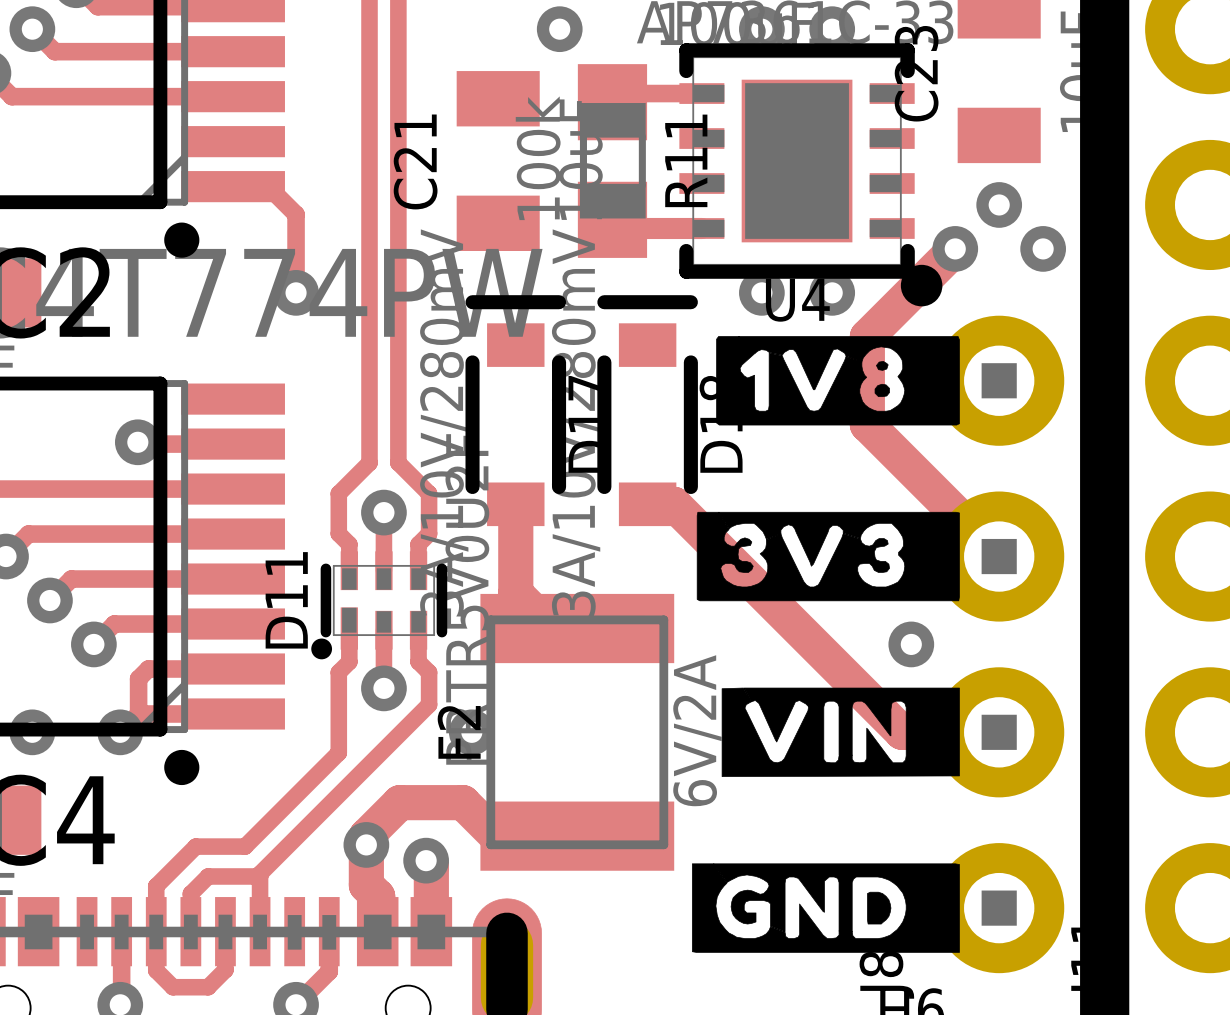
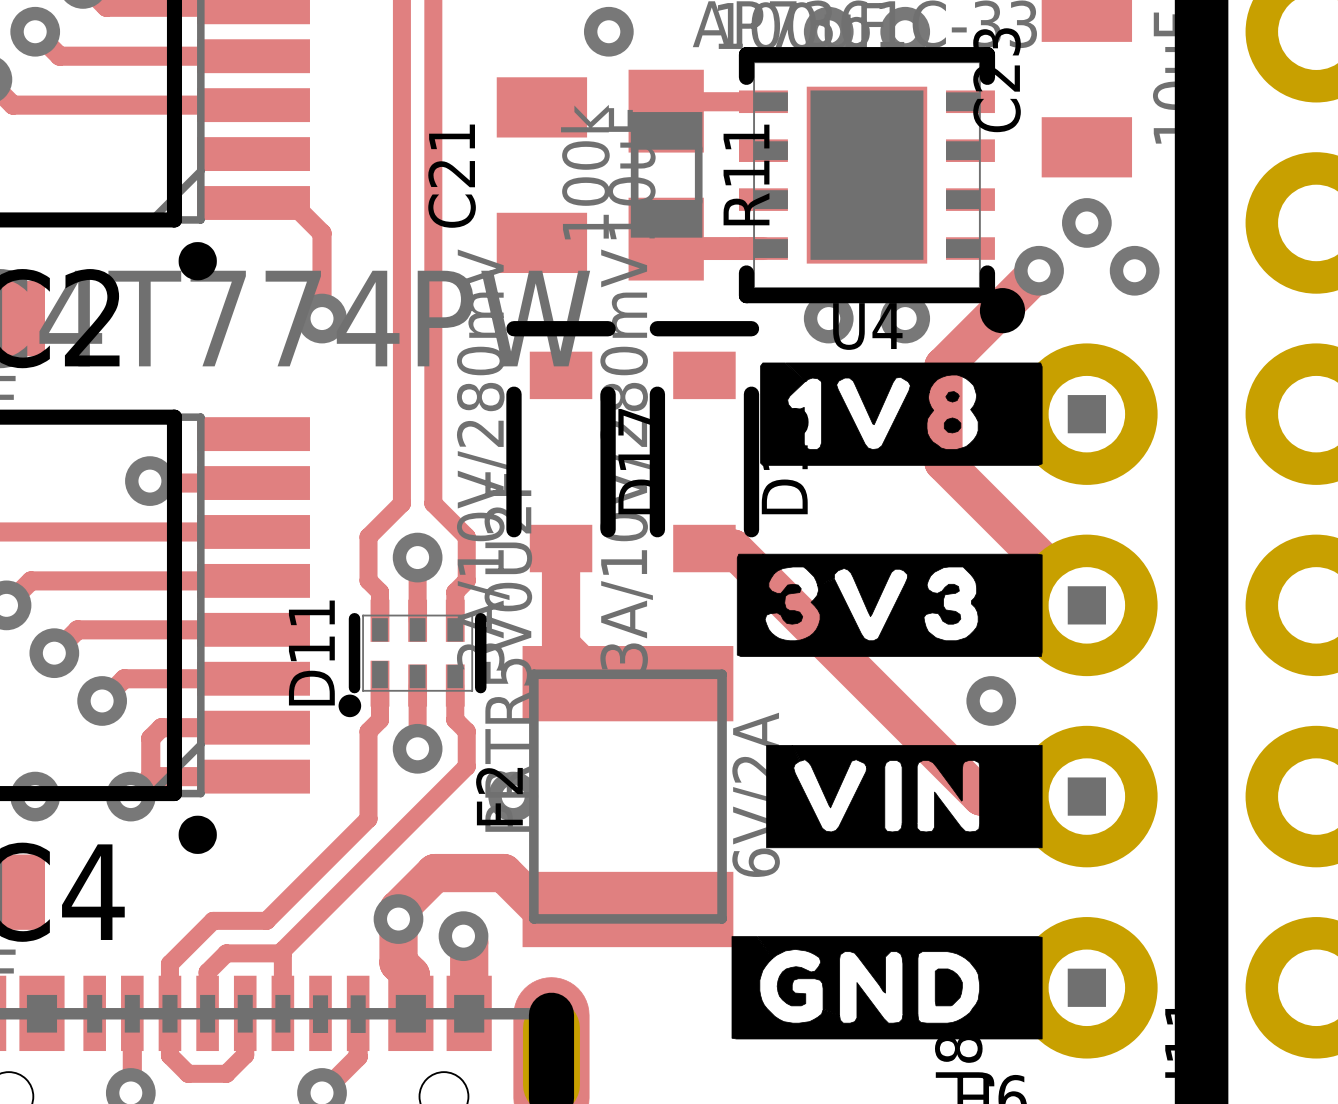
drawing shape: [716, 336, 960, 426] -> [760, 362, 1043, 466]
drawing shape: [696, 511, 960, 602] -> [736, 553, 1043, 657]
drawing shape: [721, 687, 960, 777] -> [766, 745, 1043, 849]
drawing shape: [691, 863, 960, 953] -> [731, 936, 1043, 1040]

